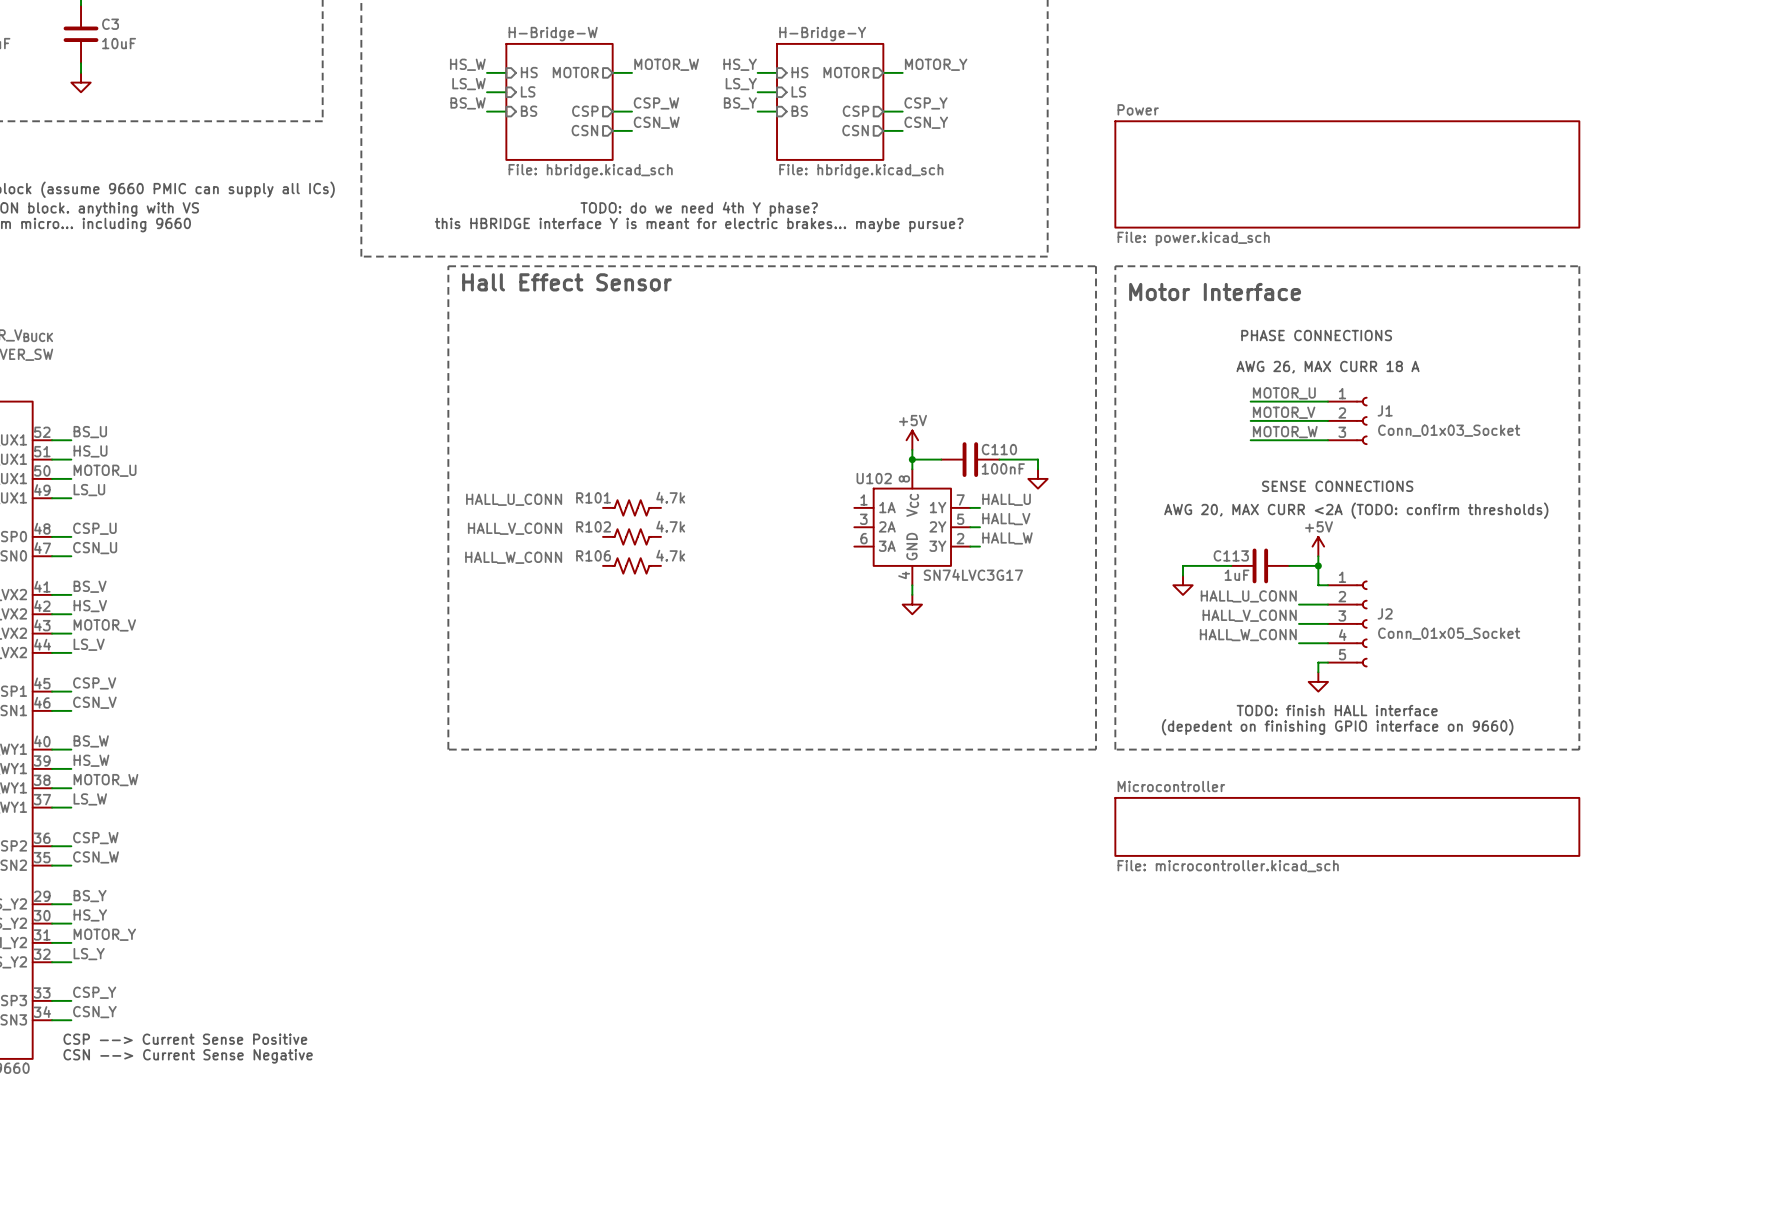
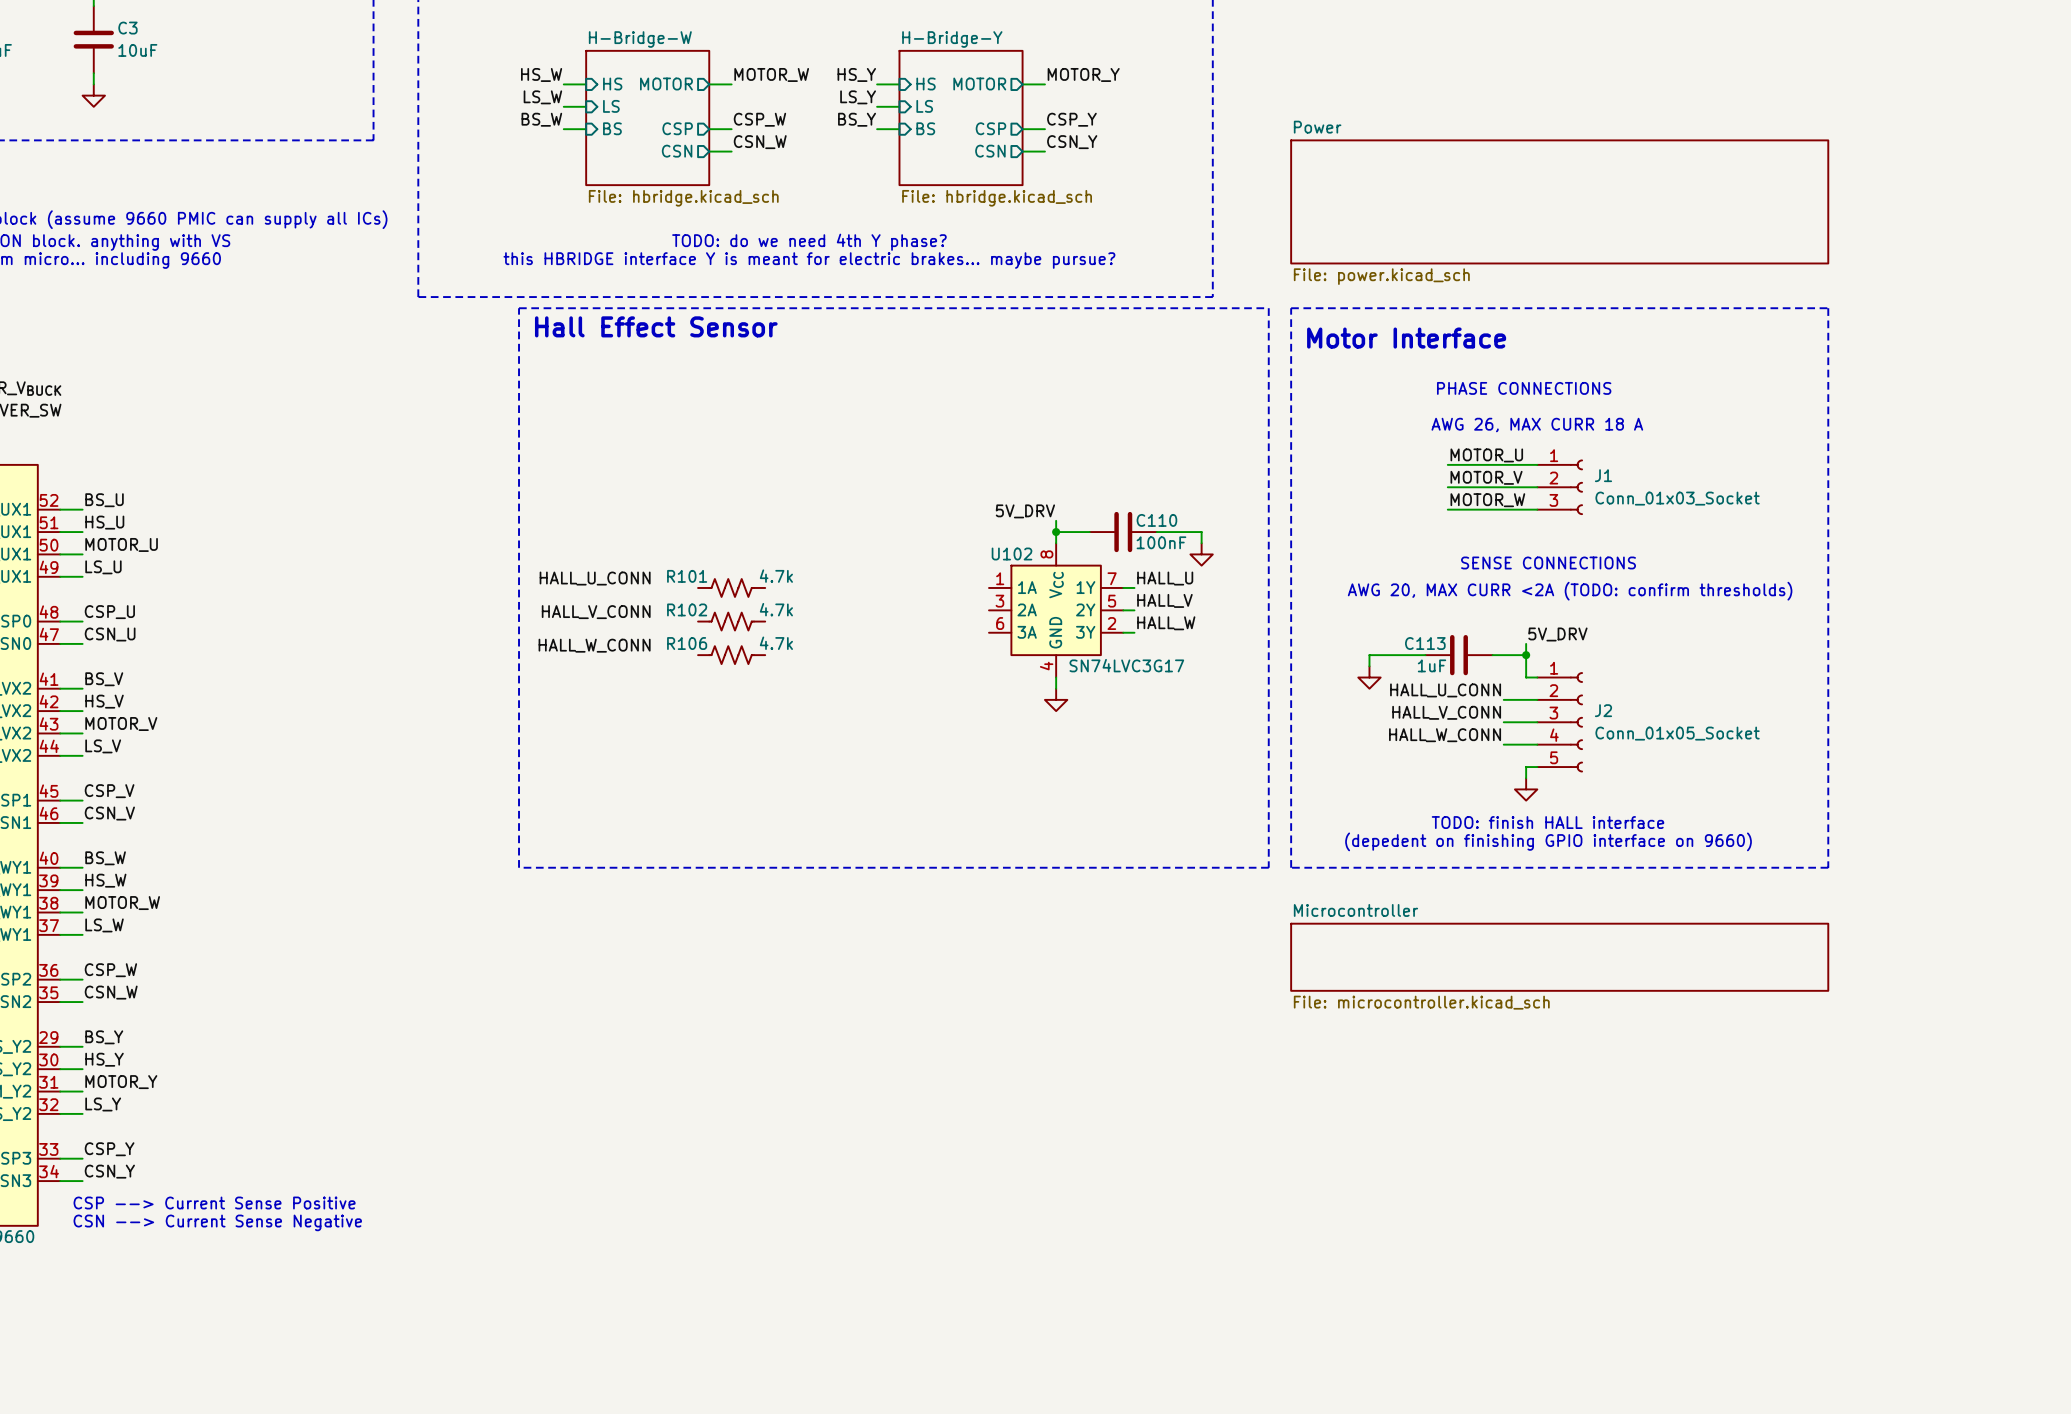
power symbol: +5V (912, 440) -> none
label: none -> 5V_DRV (1025, 511)
power symbol: +5V (1318, 546) -> none
label: none -> 5V_DRV (1557, 634)

